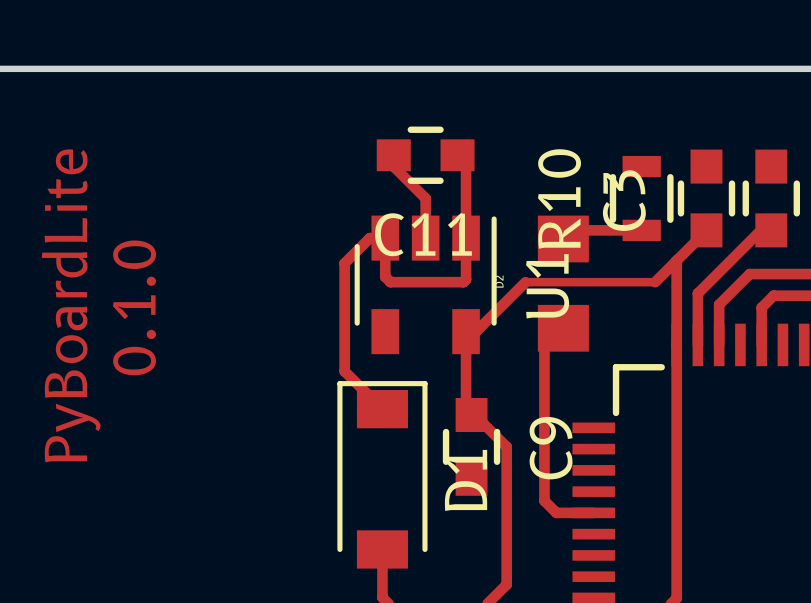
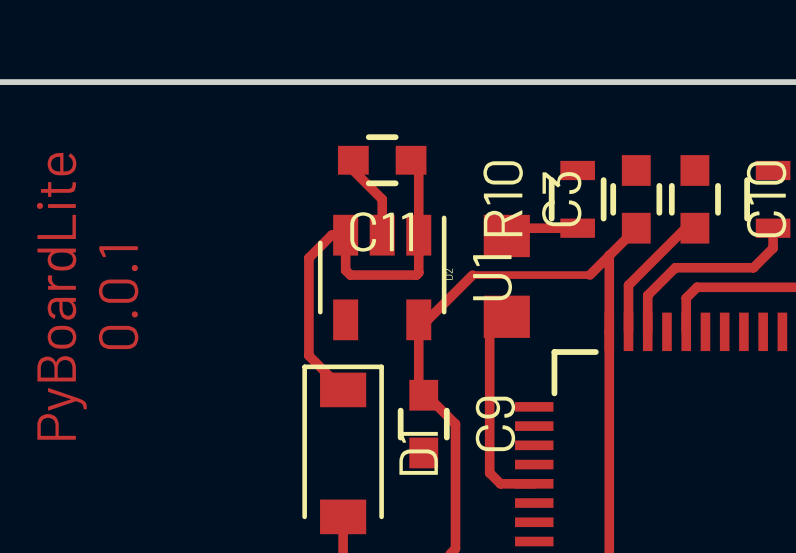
text: 0.1.0 (134, 307) -> 0.0.1 (118, 297)

